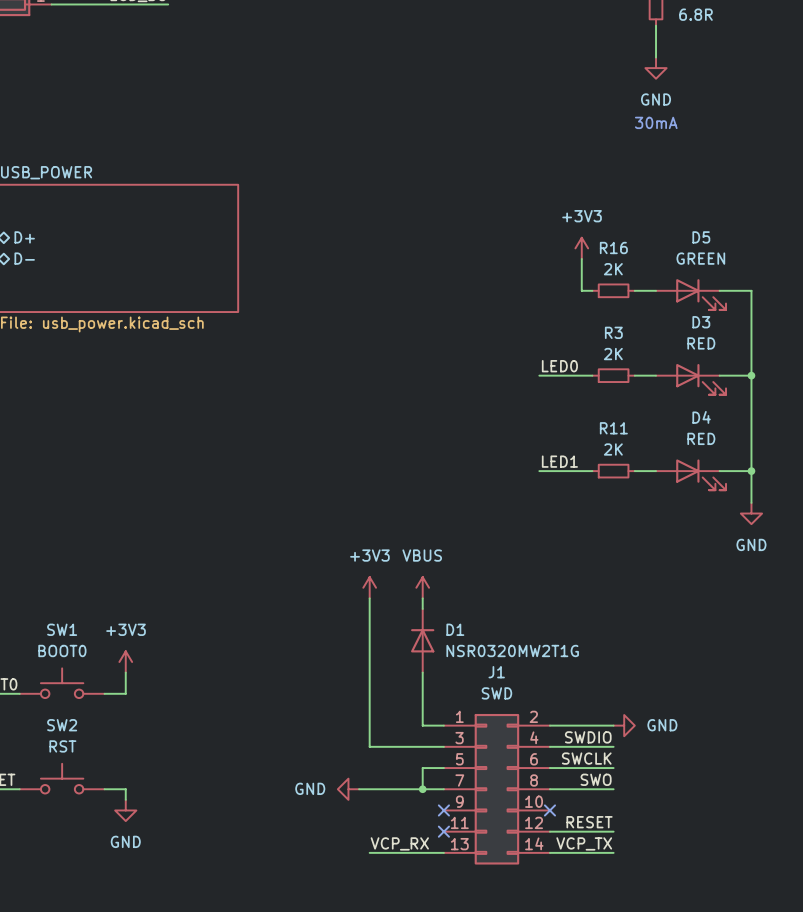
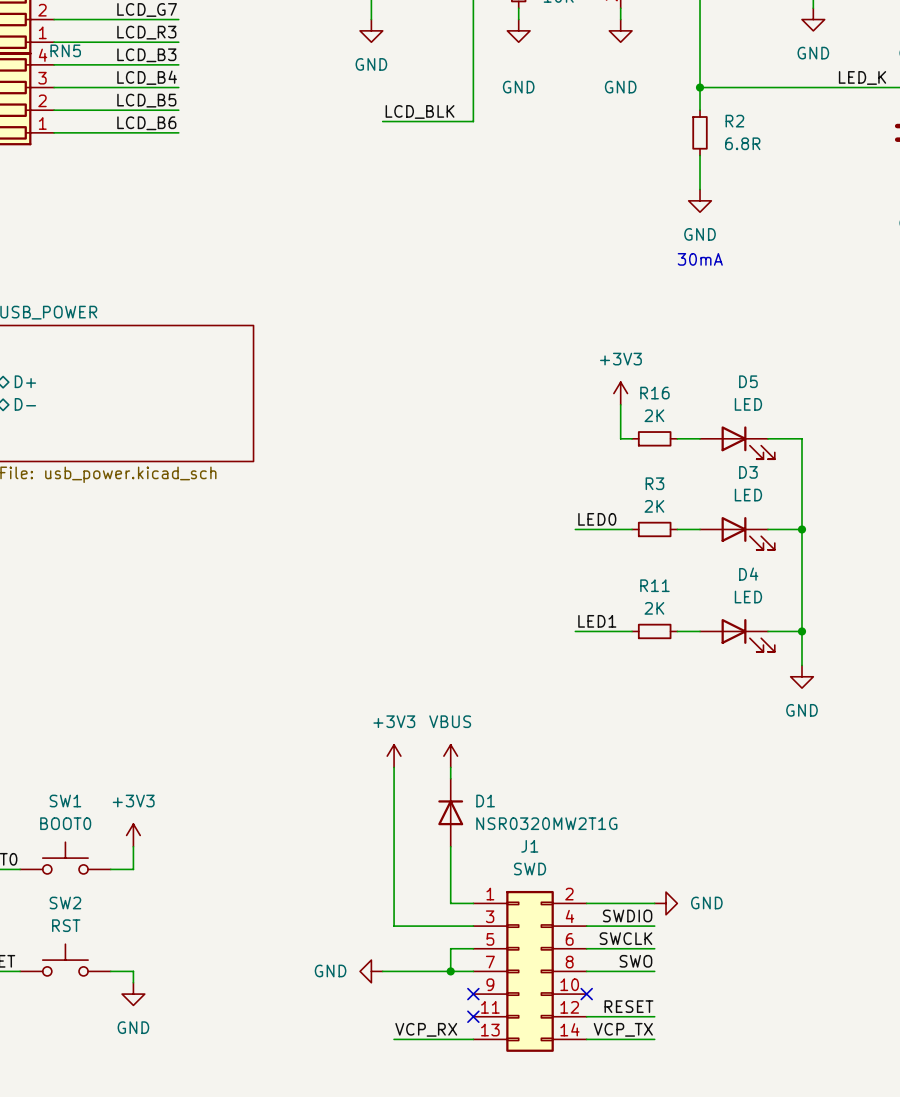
D5 value: GREEN (700, 258) -> LED (748, 404)
D3 value: RED (701, 343) -> LED (748, 495)
D4 value: RED (701, 438) -> LED (748, 597)

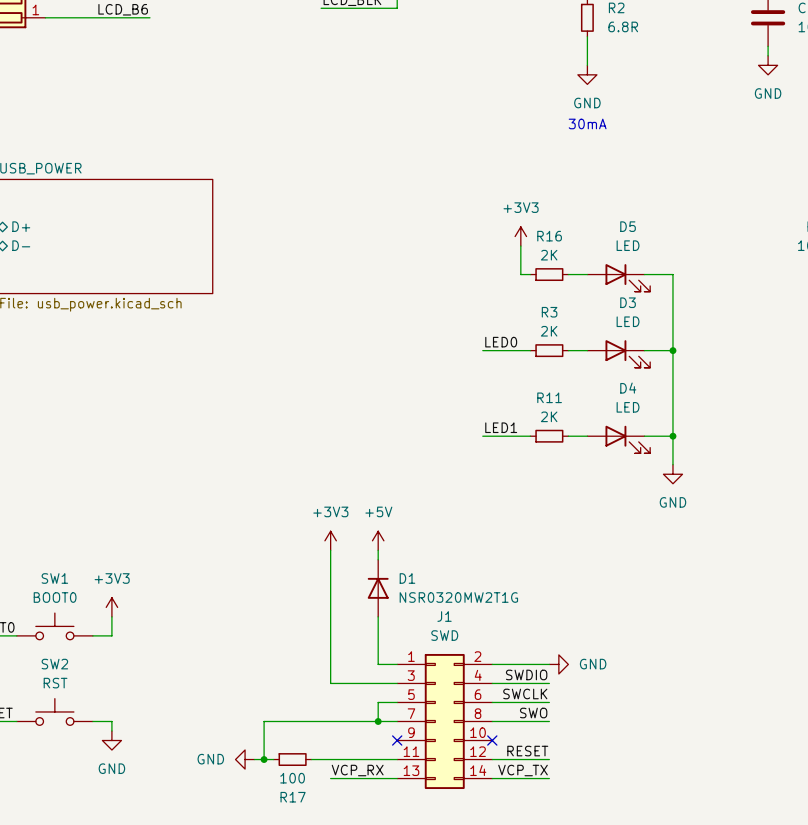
power symbol: VBUS (450, 756) -> +5V (378, 540)
power symbol position: GND (371, 971) -> GND (245, 759)
wire: none -> (321, 721) (264, 721) (264, 759)
wire: none -> (254, 759) (273, 759)
junction: none -> (264, 759)
R17: none -> 100 (292, 759)
wire: none -> (311, 759) (397, 759)
no-connect mark: (473, 1016) -> none

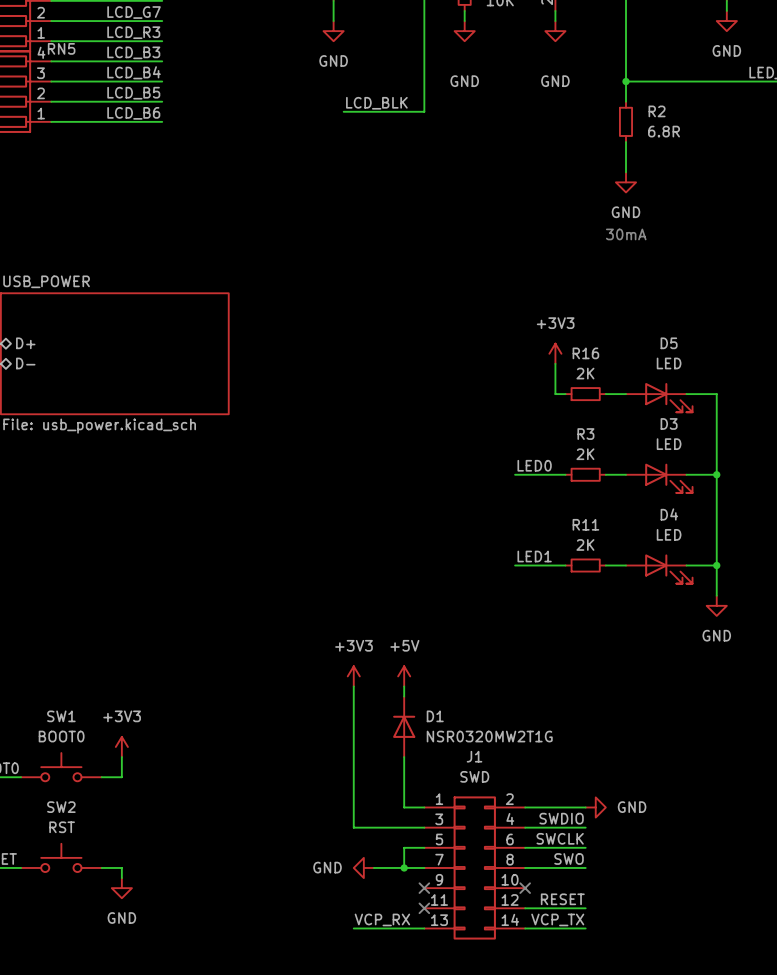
wire: (349, 721) (264, 721) (264, 759) -> none
power symbol position: GND (245, 759) -> GND (363, 867)
wire: (254, 759) (273, 759) -> none
junction: (264, 759) -> none
R17: 100 (292, 759) -> none
wire: (311, 759) (397, 759) -> none
no-connect mark: none -> (424, 908)

